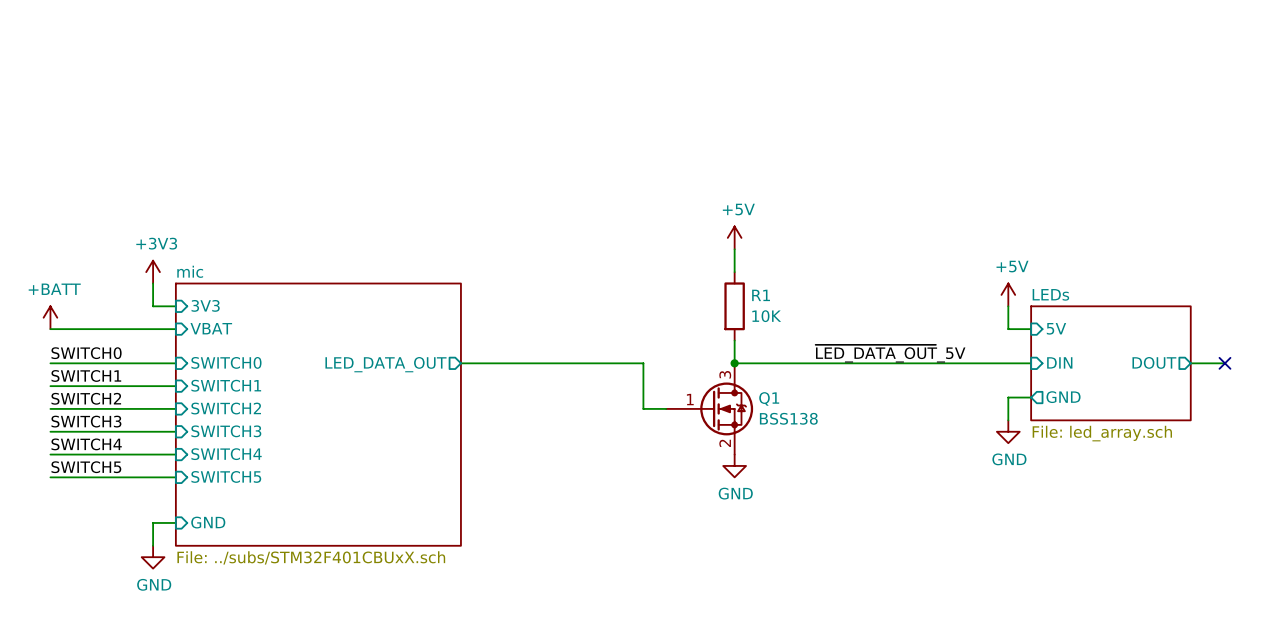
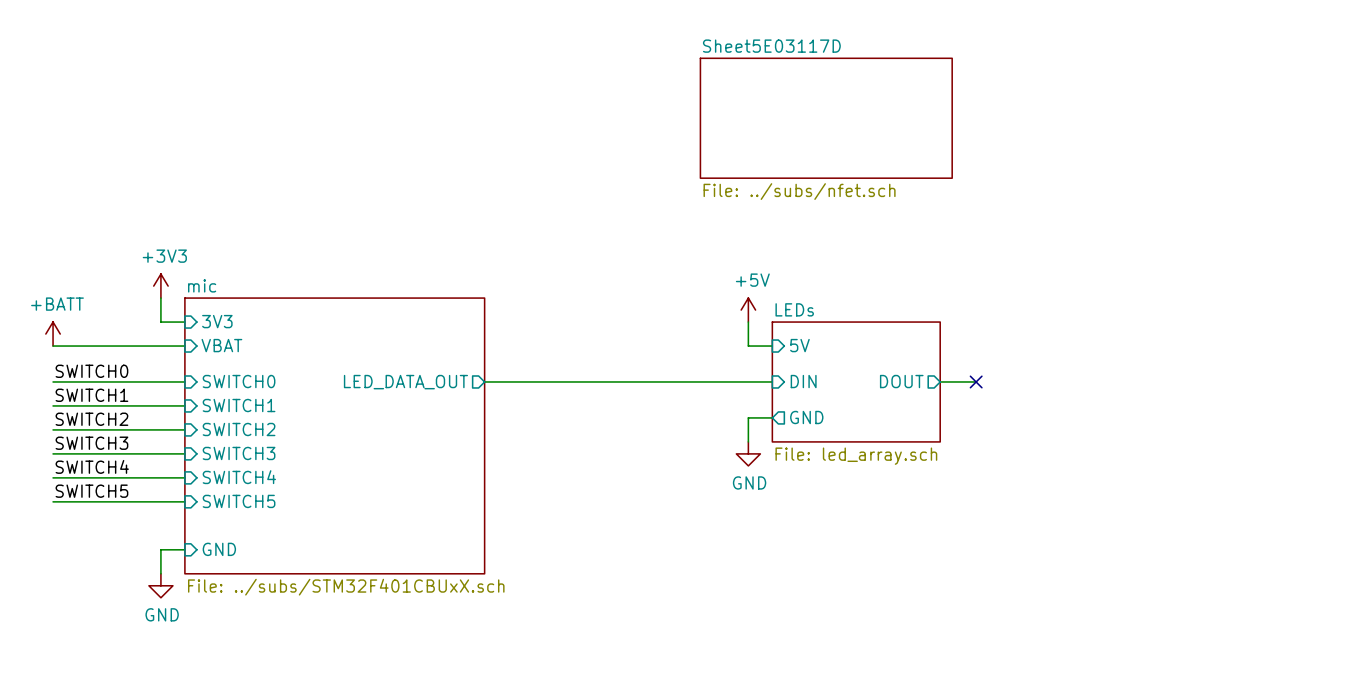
sheet Sheet5E03117D: none -> File: ../subs/nfet.sch (826, 118)
power symbol position: +5V (734, 237) -> +5V (748, 310)
wire: (734, 249) (734, 272) -> none
power symbol: +5V (1008, 294) -> none
wire: none -> (748, 322) (748, 346) (772, 346)
R1: 10K (734, 306) -> none
wire: (1008, 306) (1008, 329) (1031, 329) -> none
sheet pin: none -> 5V (799, 345)
sheet pin: 5V (1056, 328) -> none
wire: (734, 340) (734, 363) (894, 363) -> none
label: ~{LED_DATA_OUT}_5V (890, 353) -> none
sheet pin: none -> DIN (803, 381)
sheet pin: none -> DOUT (901, 381)
sheet pin: DIN (1059, 362) -> none
sheet pin: DOUT (1154, 362) -> none
wire: (643, 363) (643, 408) (666, 408) -> (676, 381) (772, 381)
junction: (734, 363) -> none
sheet LEDs: none -> File: led_array.sch (856, 381)
wire: (928, 363) (1031, 363) -> none
no-connect mark: none -> (976, 381)
sheet LEDs: File: led_array.sch (1110, 363) -> none
wire: (1190, 363) (1224, 363) -> none
no-connect mark: (1224, 363) -> none
wire: none -> (772, 417) (748, 417) (748, 441)
sheet pin: none -> GND (806, 417)
wire: (1031, 397) (1008, 397) (1008, 420) -> none
sheet pin: GND (1063, 397) -> none
Q1: BSS138 (709, 408) -> none
power symbol: GND (1008, 431) -> none
power symbol position: GND (734, 465) -> GND (748, 453)

